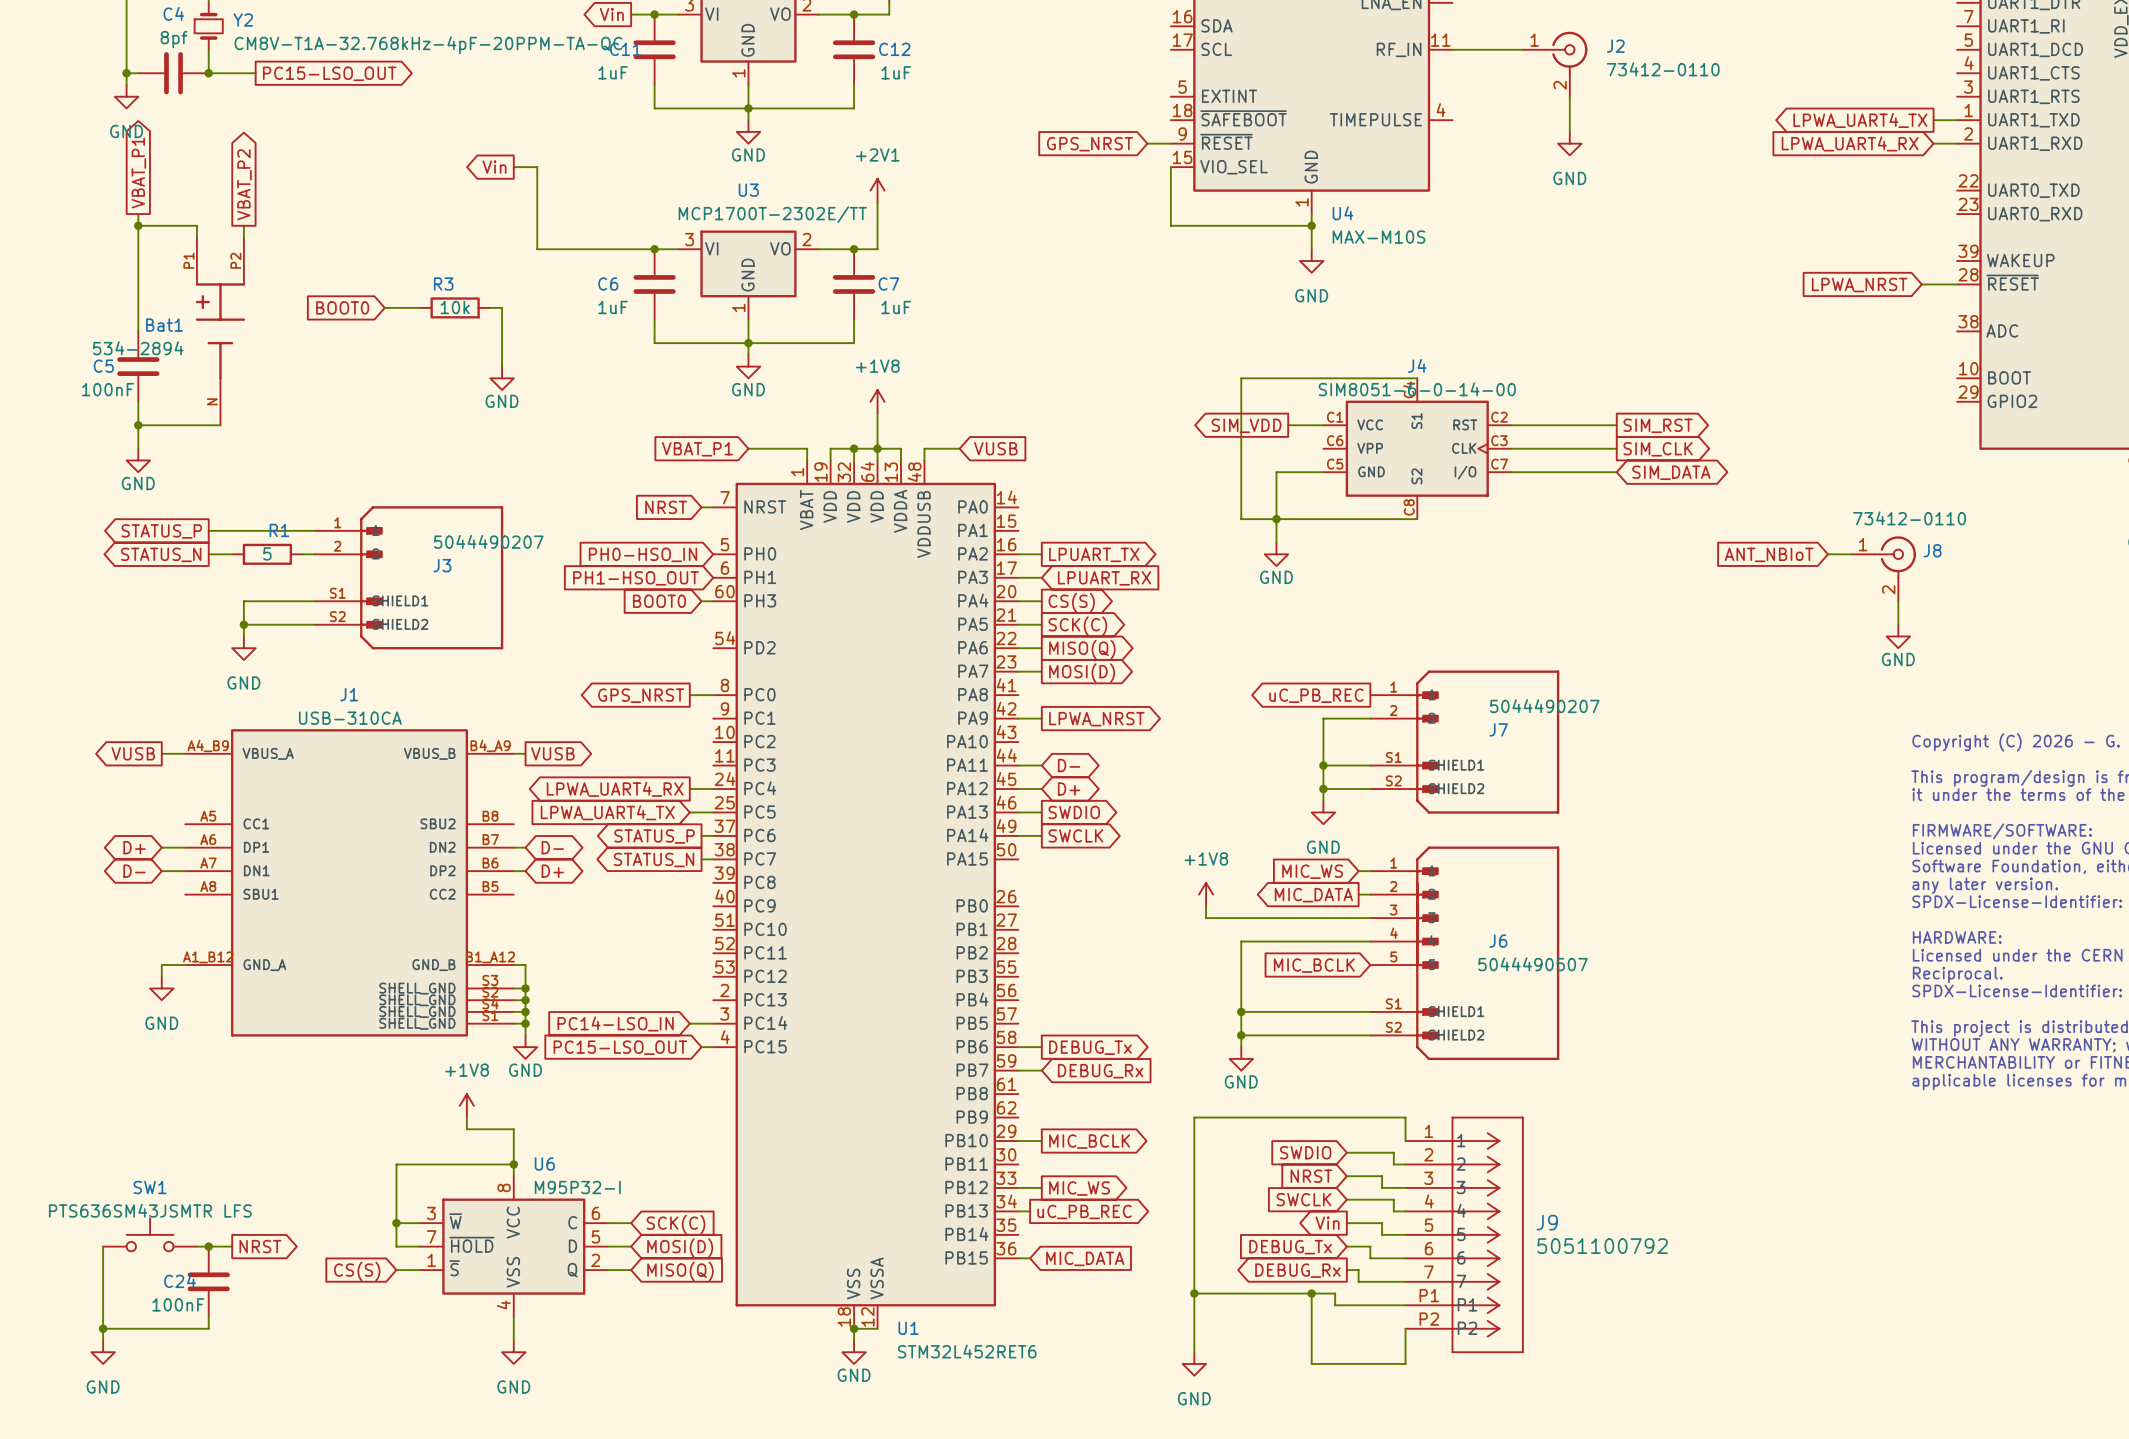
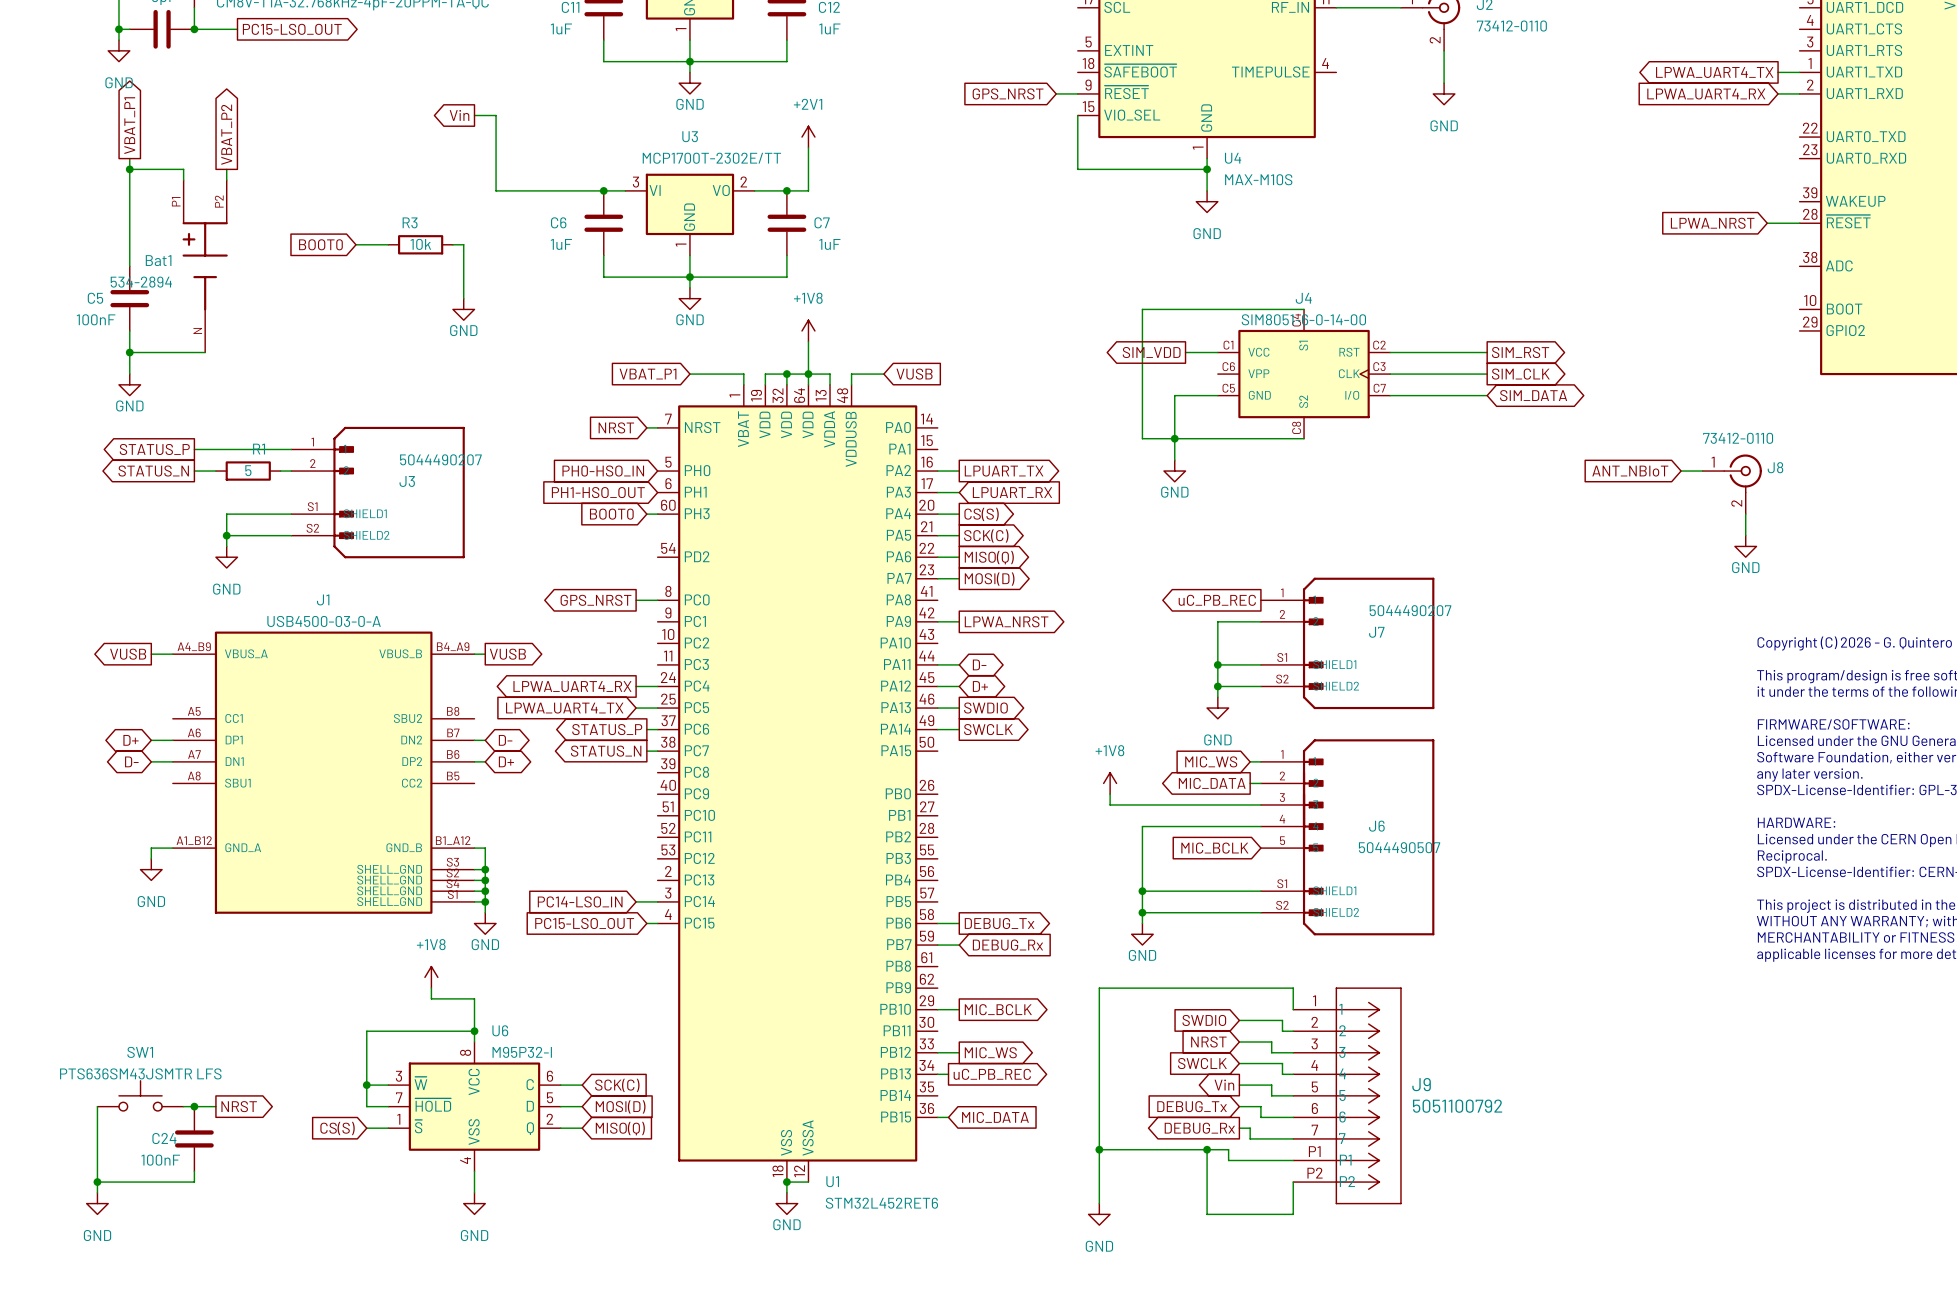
J1 value: USB-310CA (350, 718) -> USB4500-03-0-A (324, 621)

